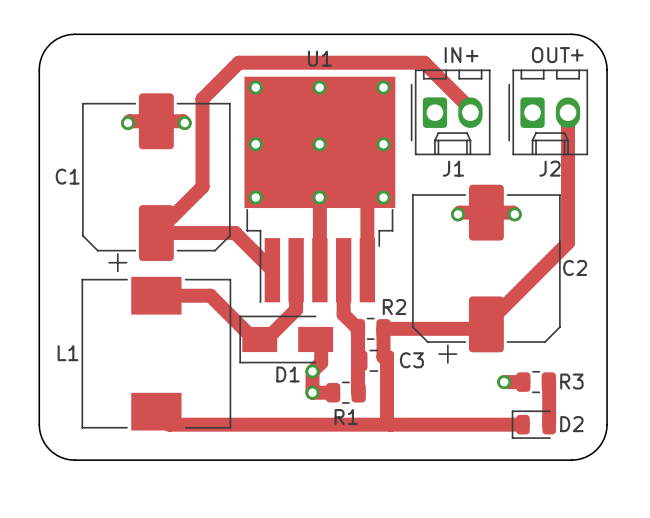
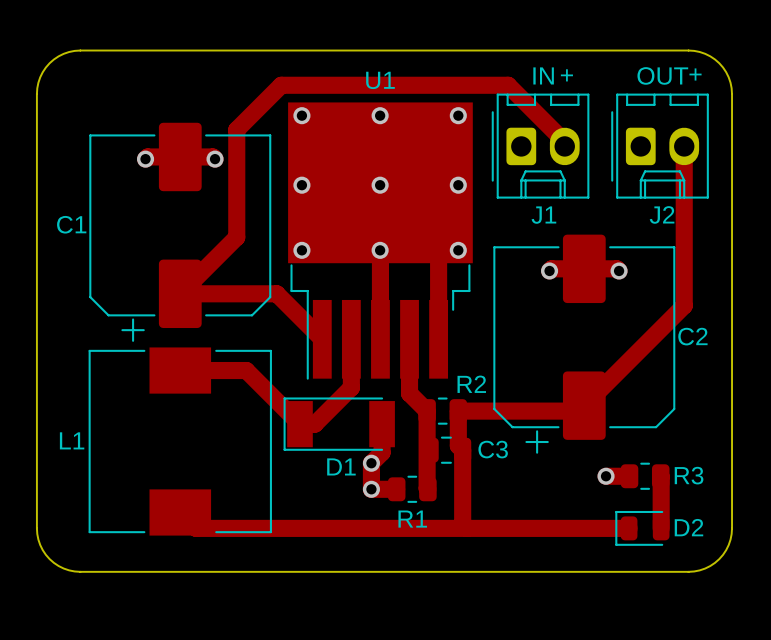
D1 footprint: [239, 315, 334, 364] -> [283, 397, 395, 451]

